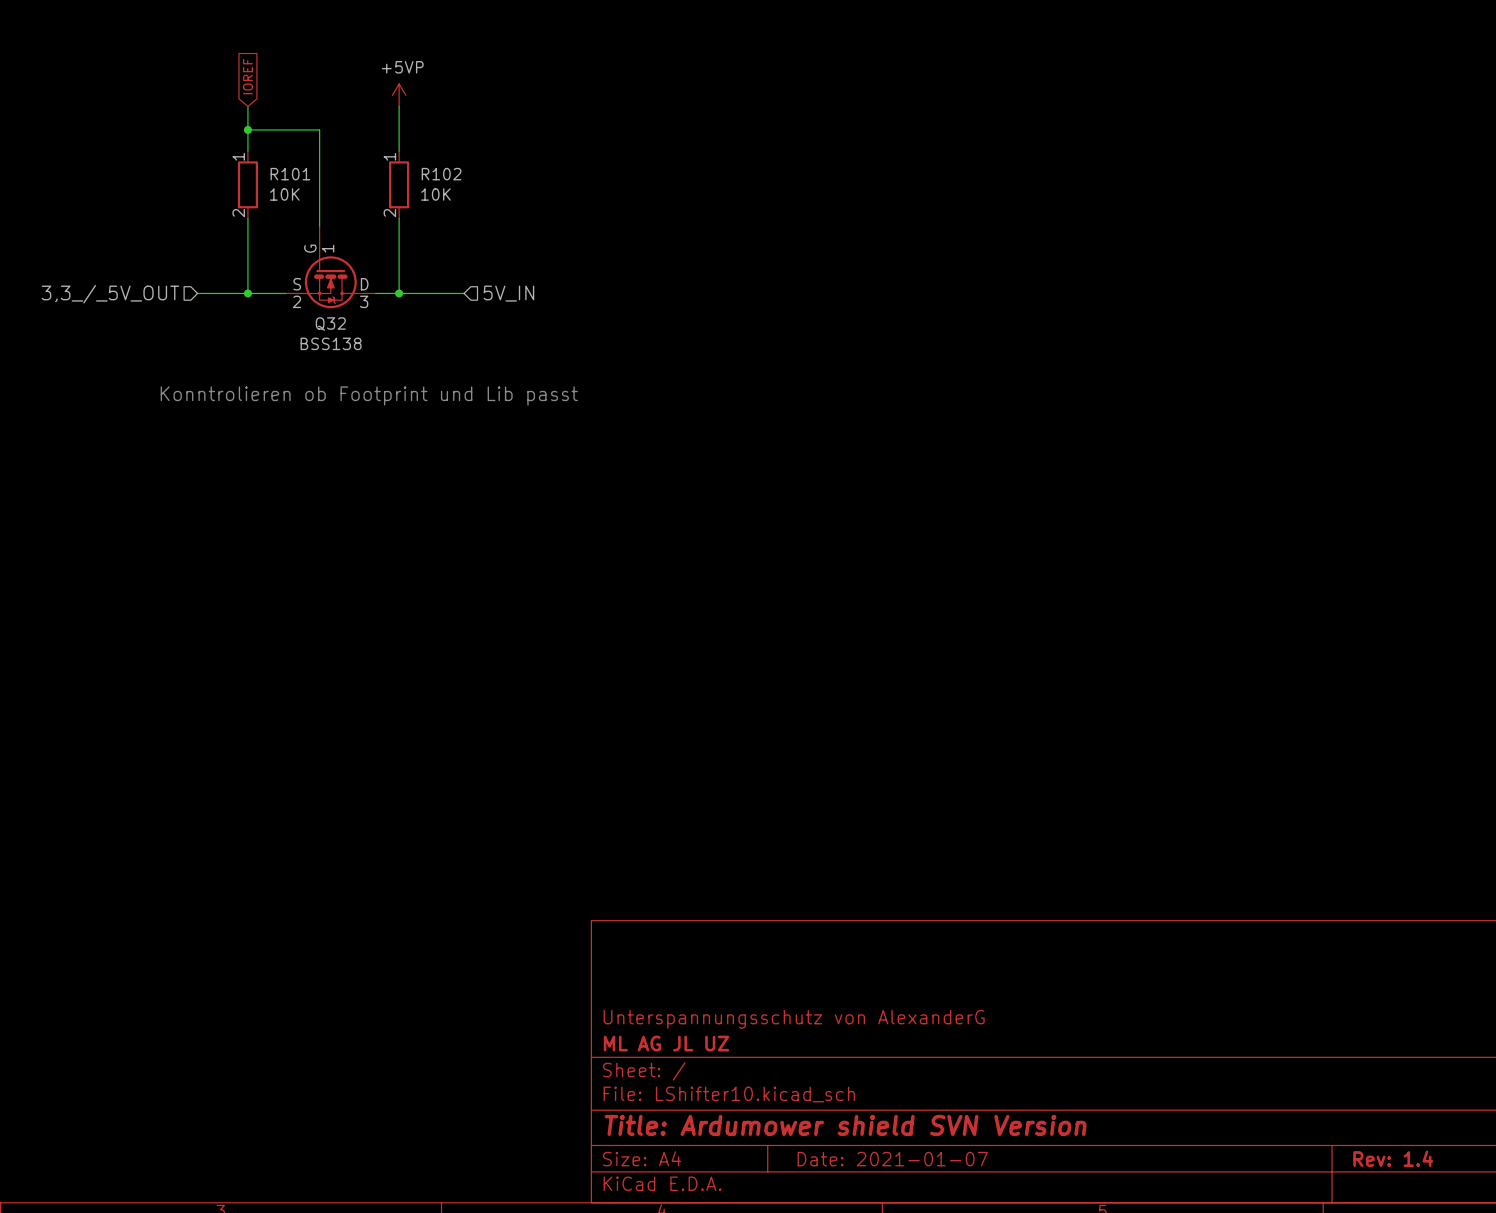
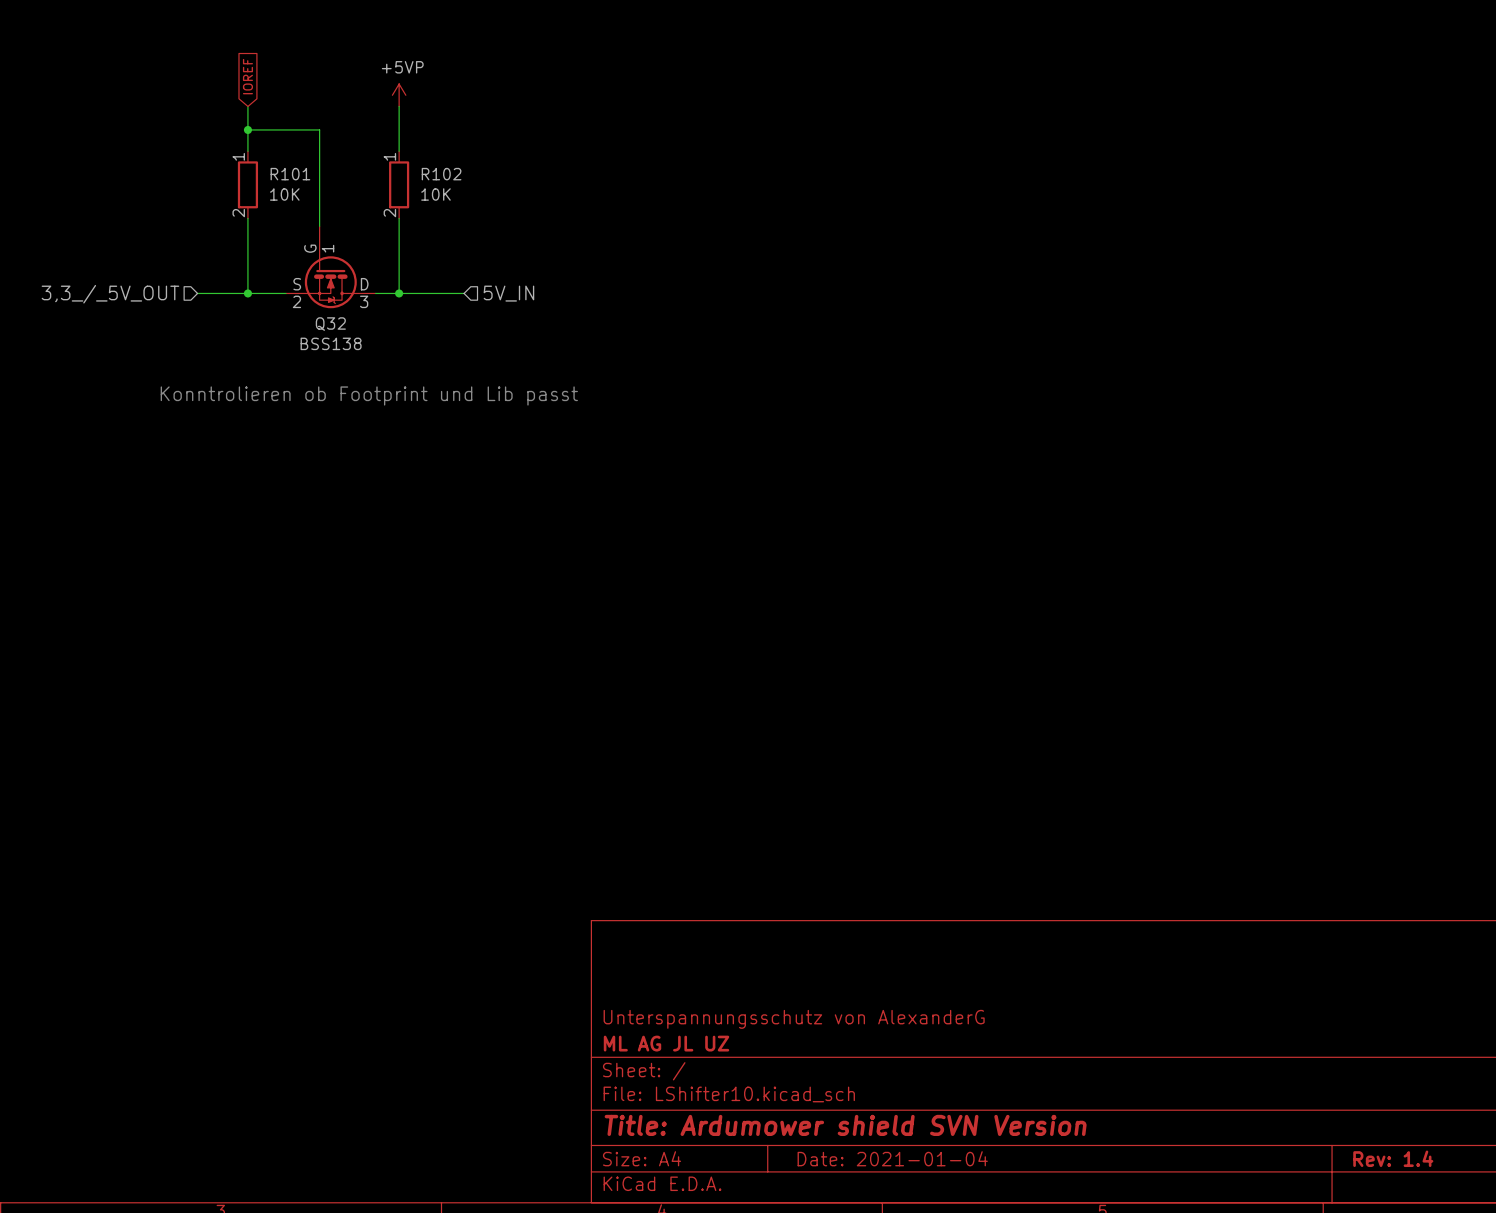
title block: Date: 2021-01-07 (892, 1159) -> Date: 2021-01-04 (892, 1158)

